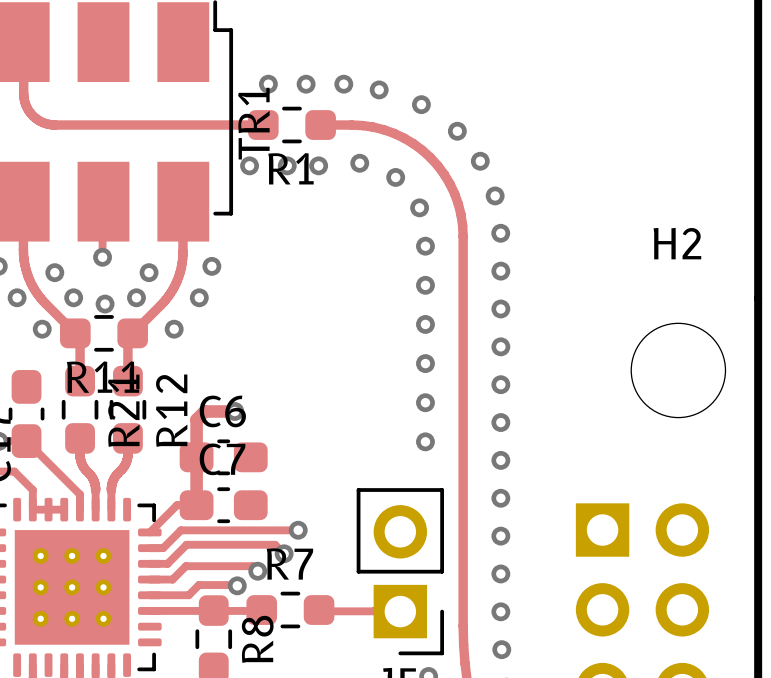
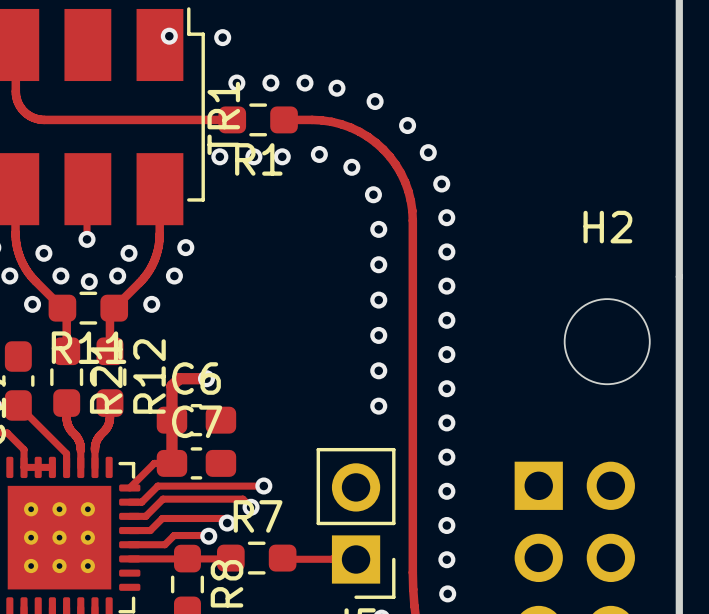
via: none -> (169, 36)
via: none -> (222, 37)

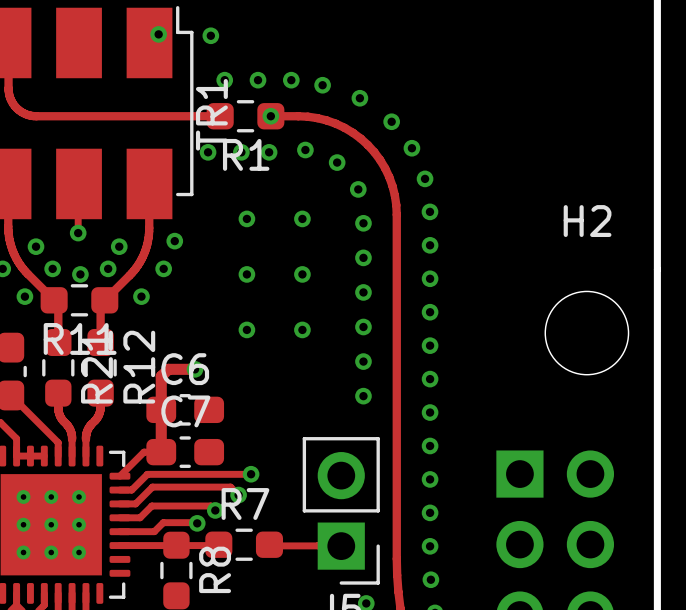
via: none -> (270, 116)
via: none -> (246, 218)
via: none -> (302, 218)
via: none -> (246, 274)
via: none -> (302, 274)
via: none -> (246, 329)
via: none -> (302, 329)

